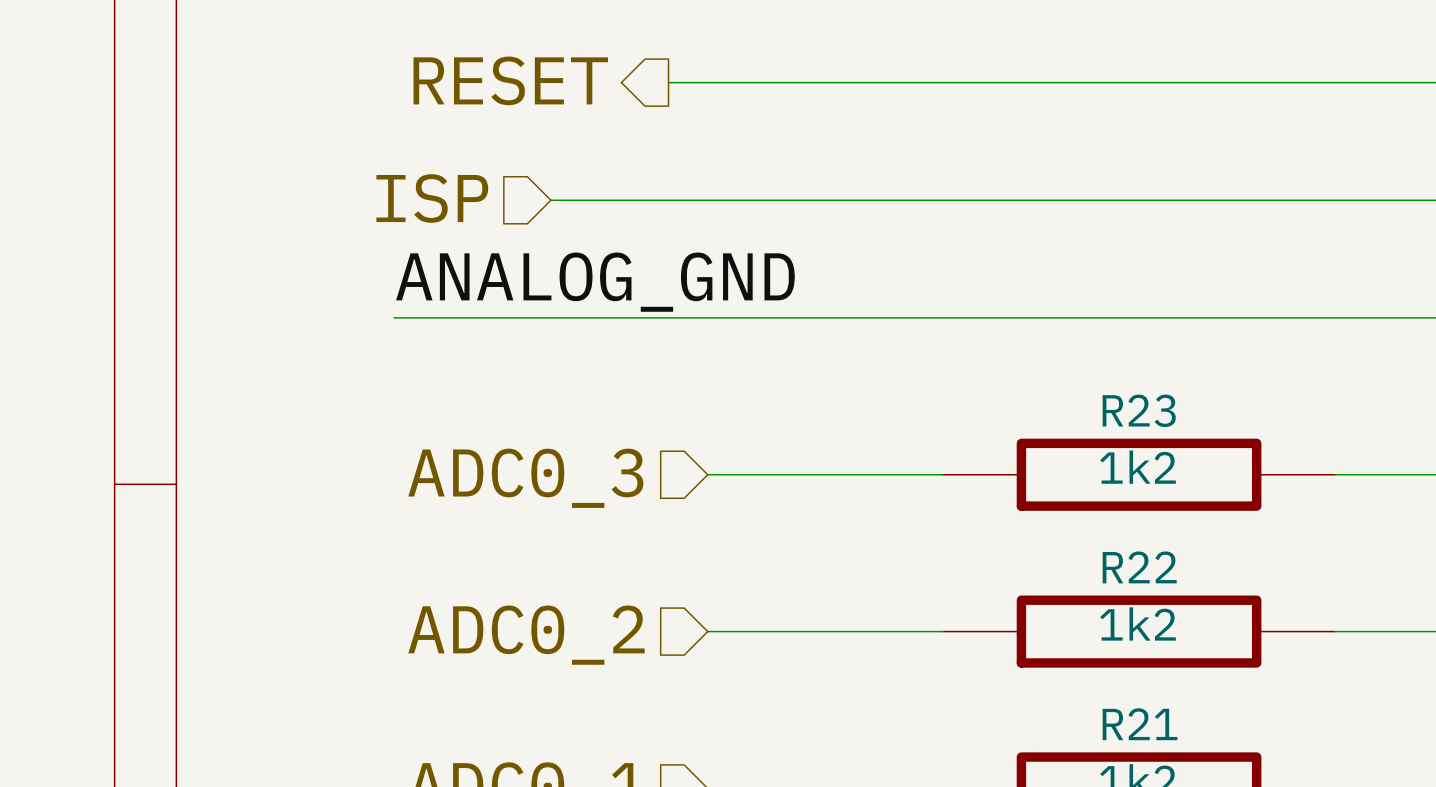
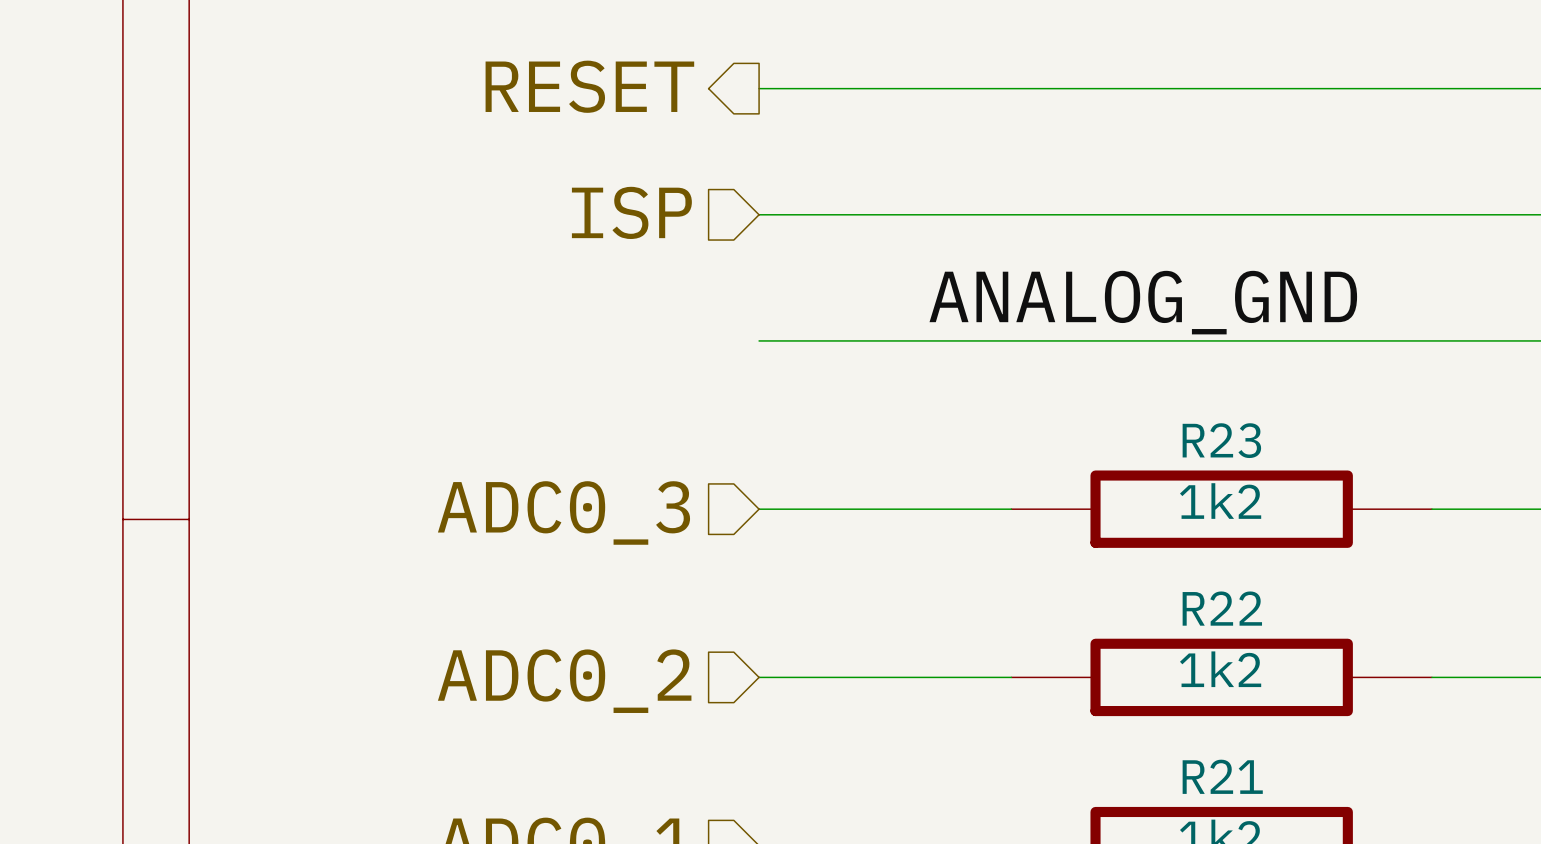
hierarchical label position: RESET (510, 80) -> RESET (589, 86)
wire: (668, 82) (707, 82) -> none
hierarchical label position: ISP (432, 198) -> ISP (631, 212)
wire: (550, 200) (707, 200) -> none
label position: ANALOG_GND (595, 282) -> ANALOG_GND (1143, 302)
wire: (394, 317) (707, 317) -> none

